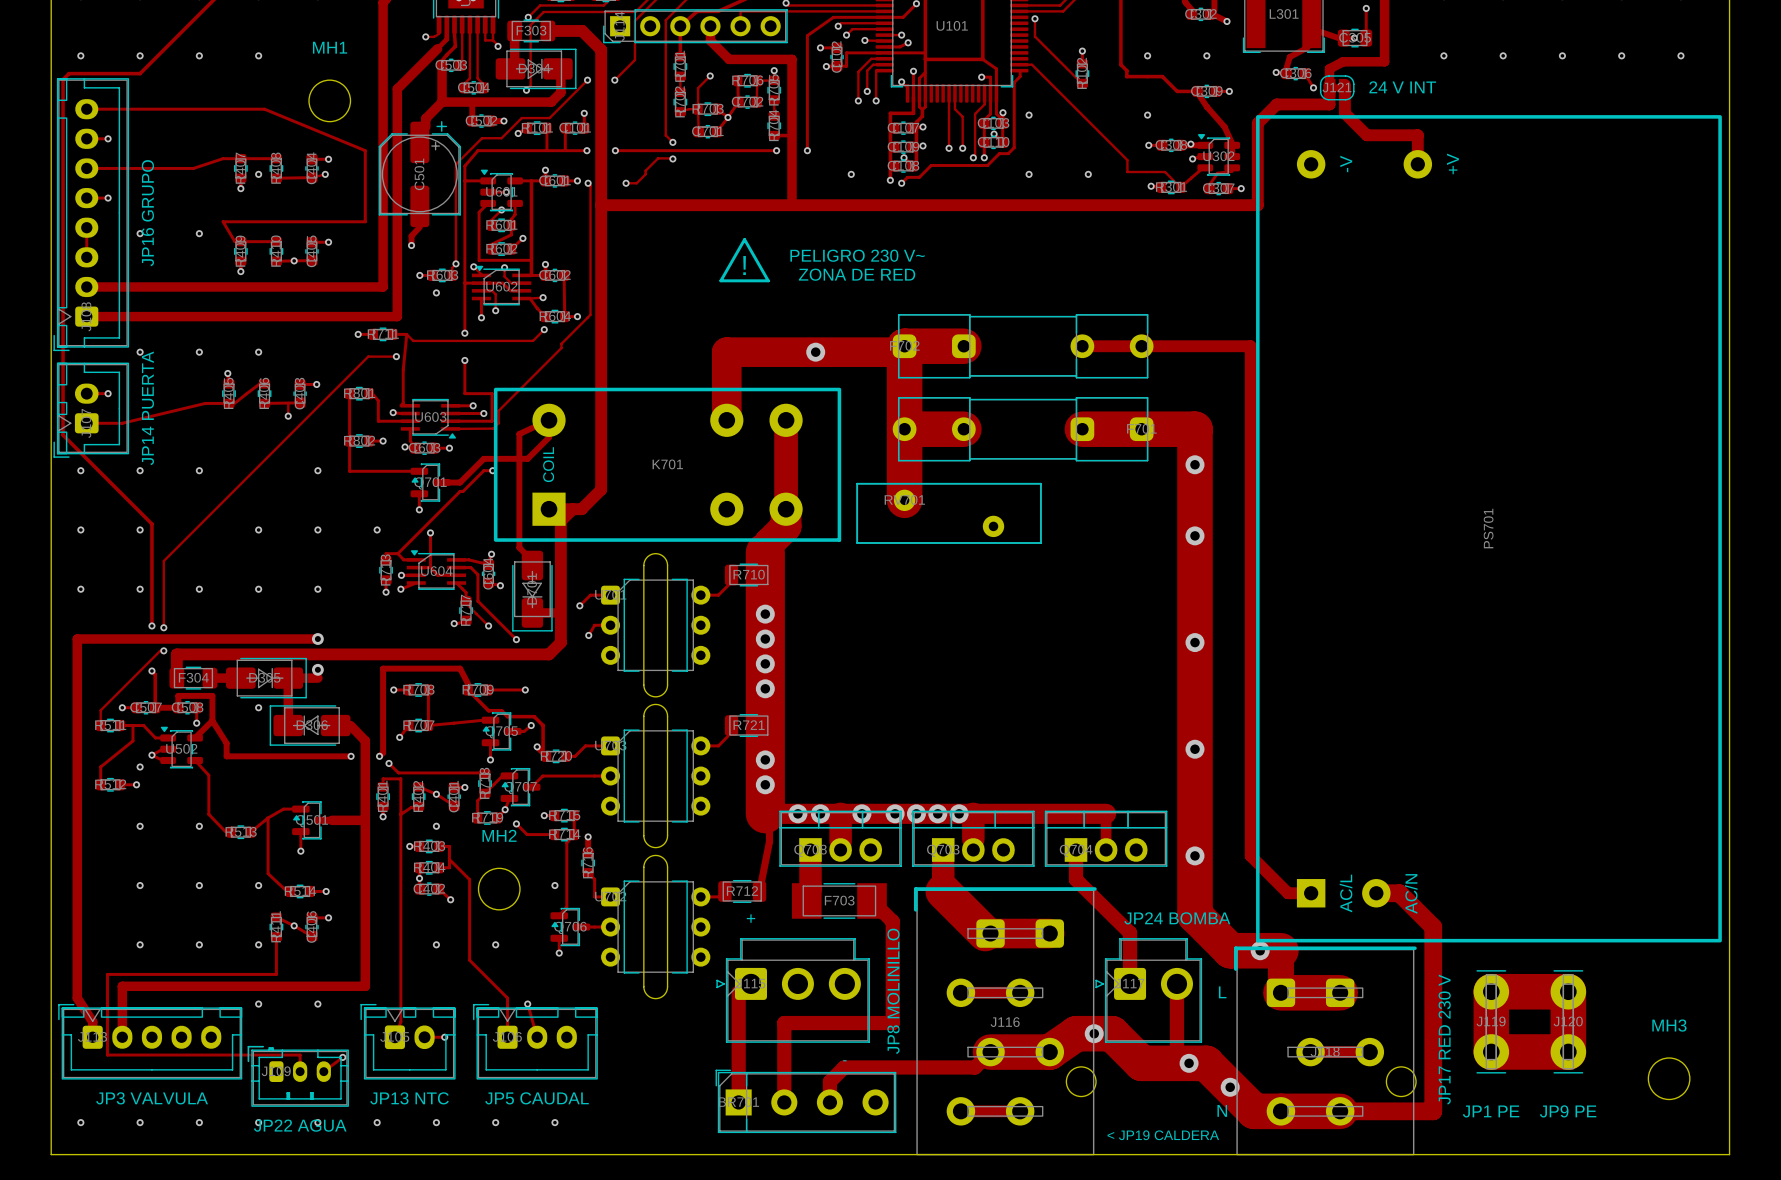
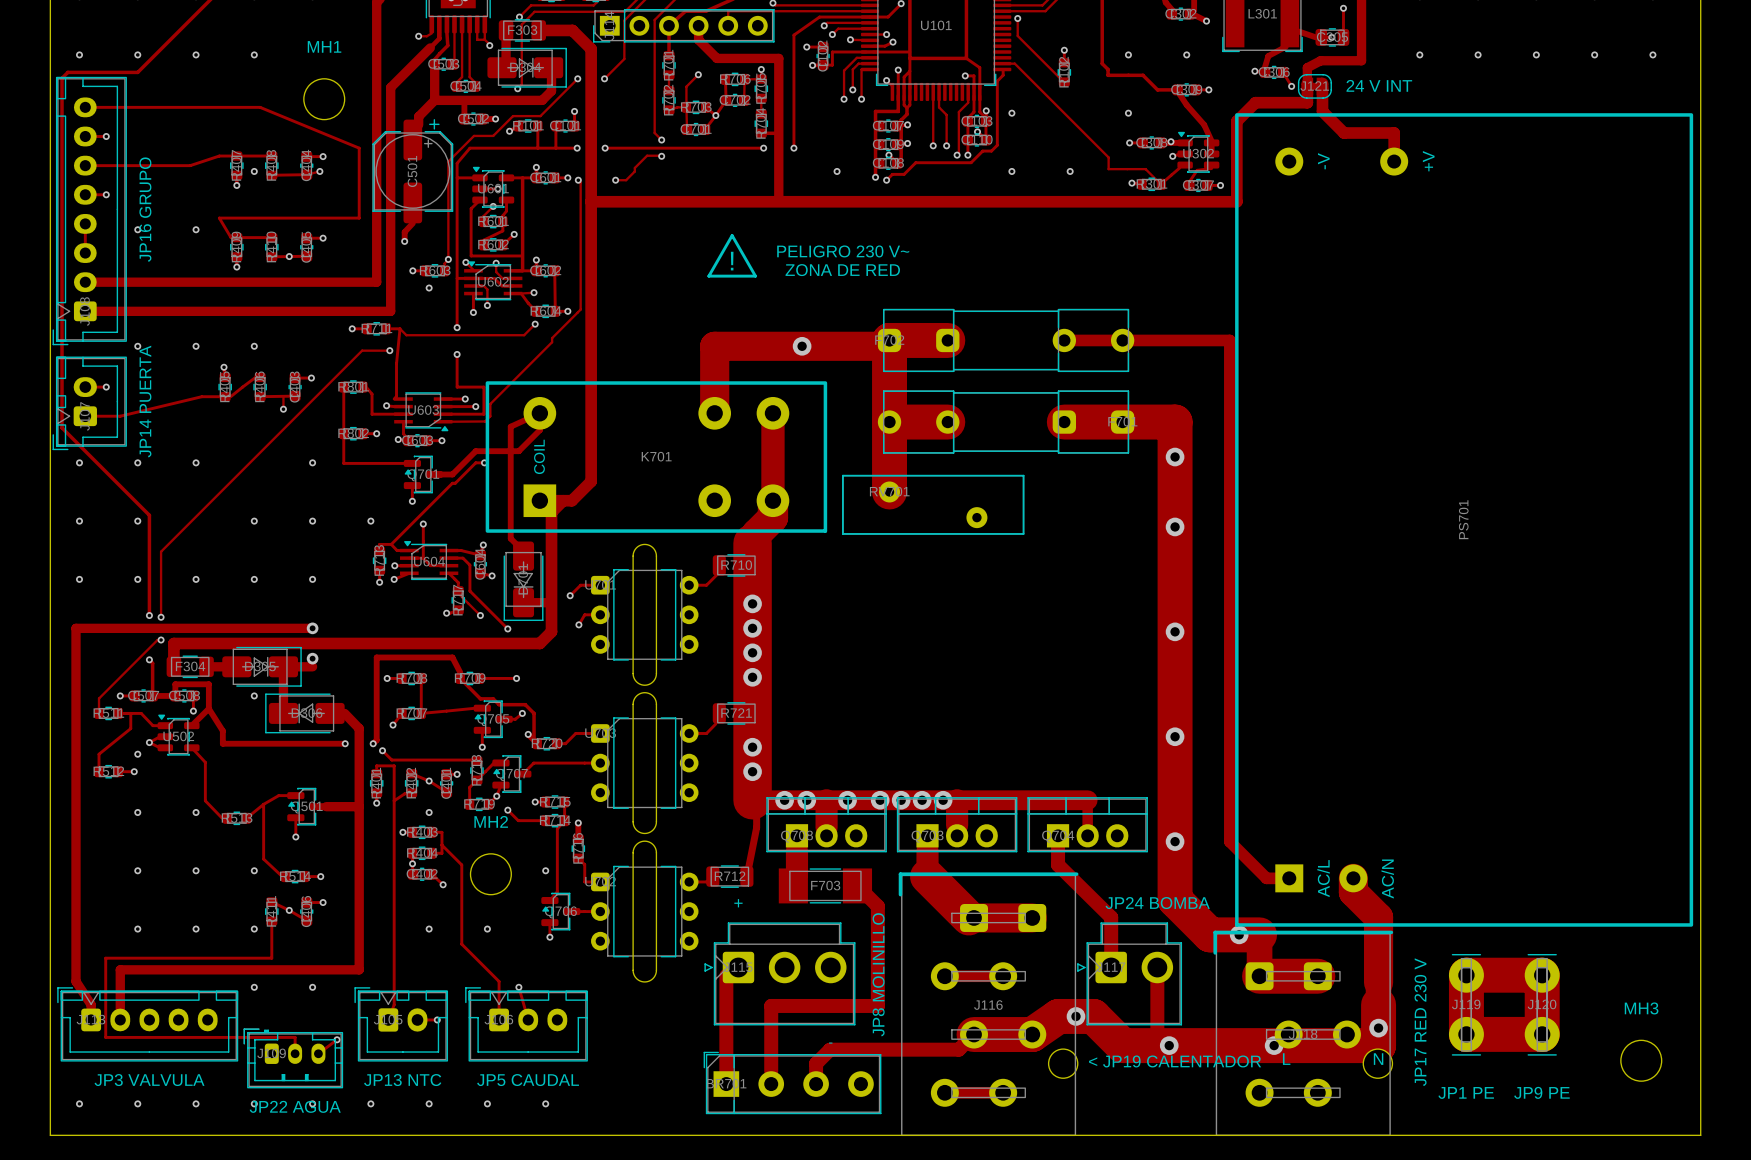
track: (1376, 893) (1399, 893) (1433, 927) (1433, 1111) (1254, 1111) (1206, 1063) -> (1353, 878) (1353, 892) (1378, 917) (1378, 1045) (1186, 1045)
text position: L (1222, 992) -> L (1286, 1059)
via: none -> (1378, 1028)
text: none -> < JP19 CALENTADOR (1175, 1061)
via position: (1230, 1087) -> (1274, 1045)
text position: N (1222, 1110) -> N (1378, 1059)
text: < JP19 CALDERA (1163, 1135) -> none

